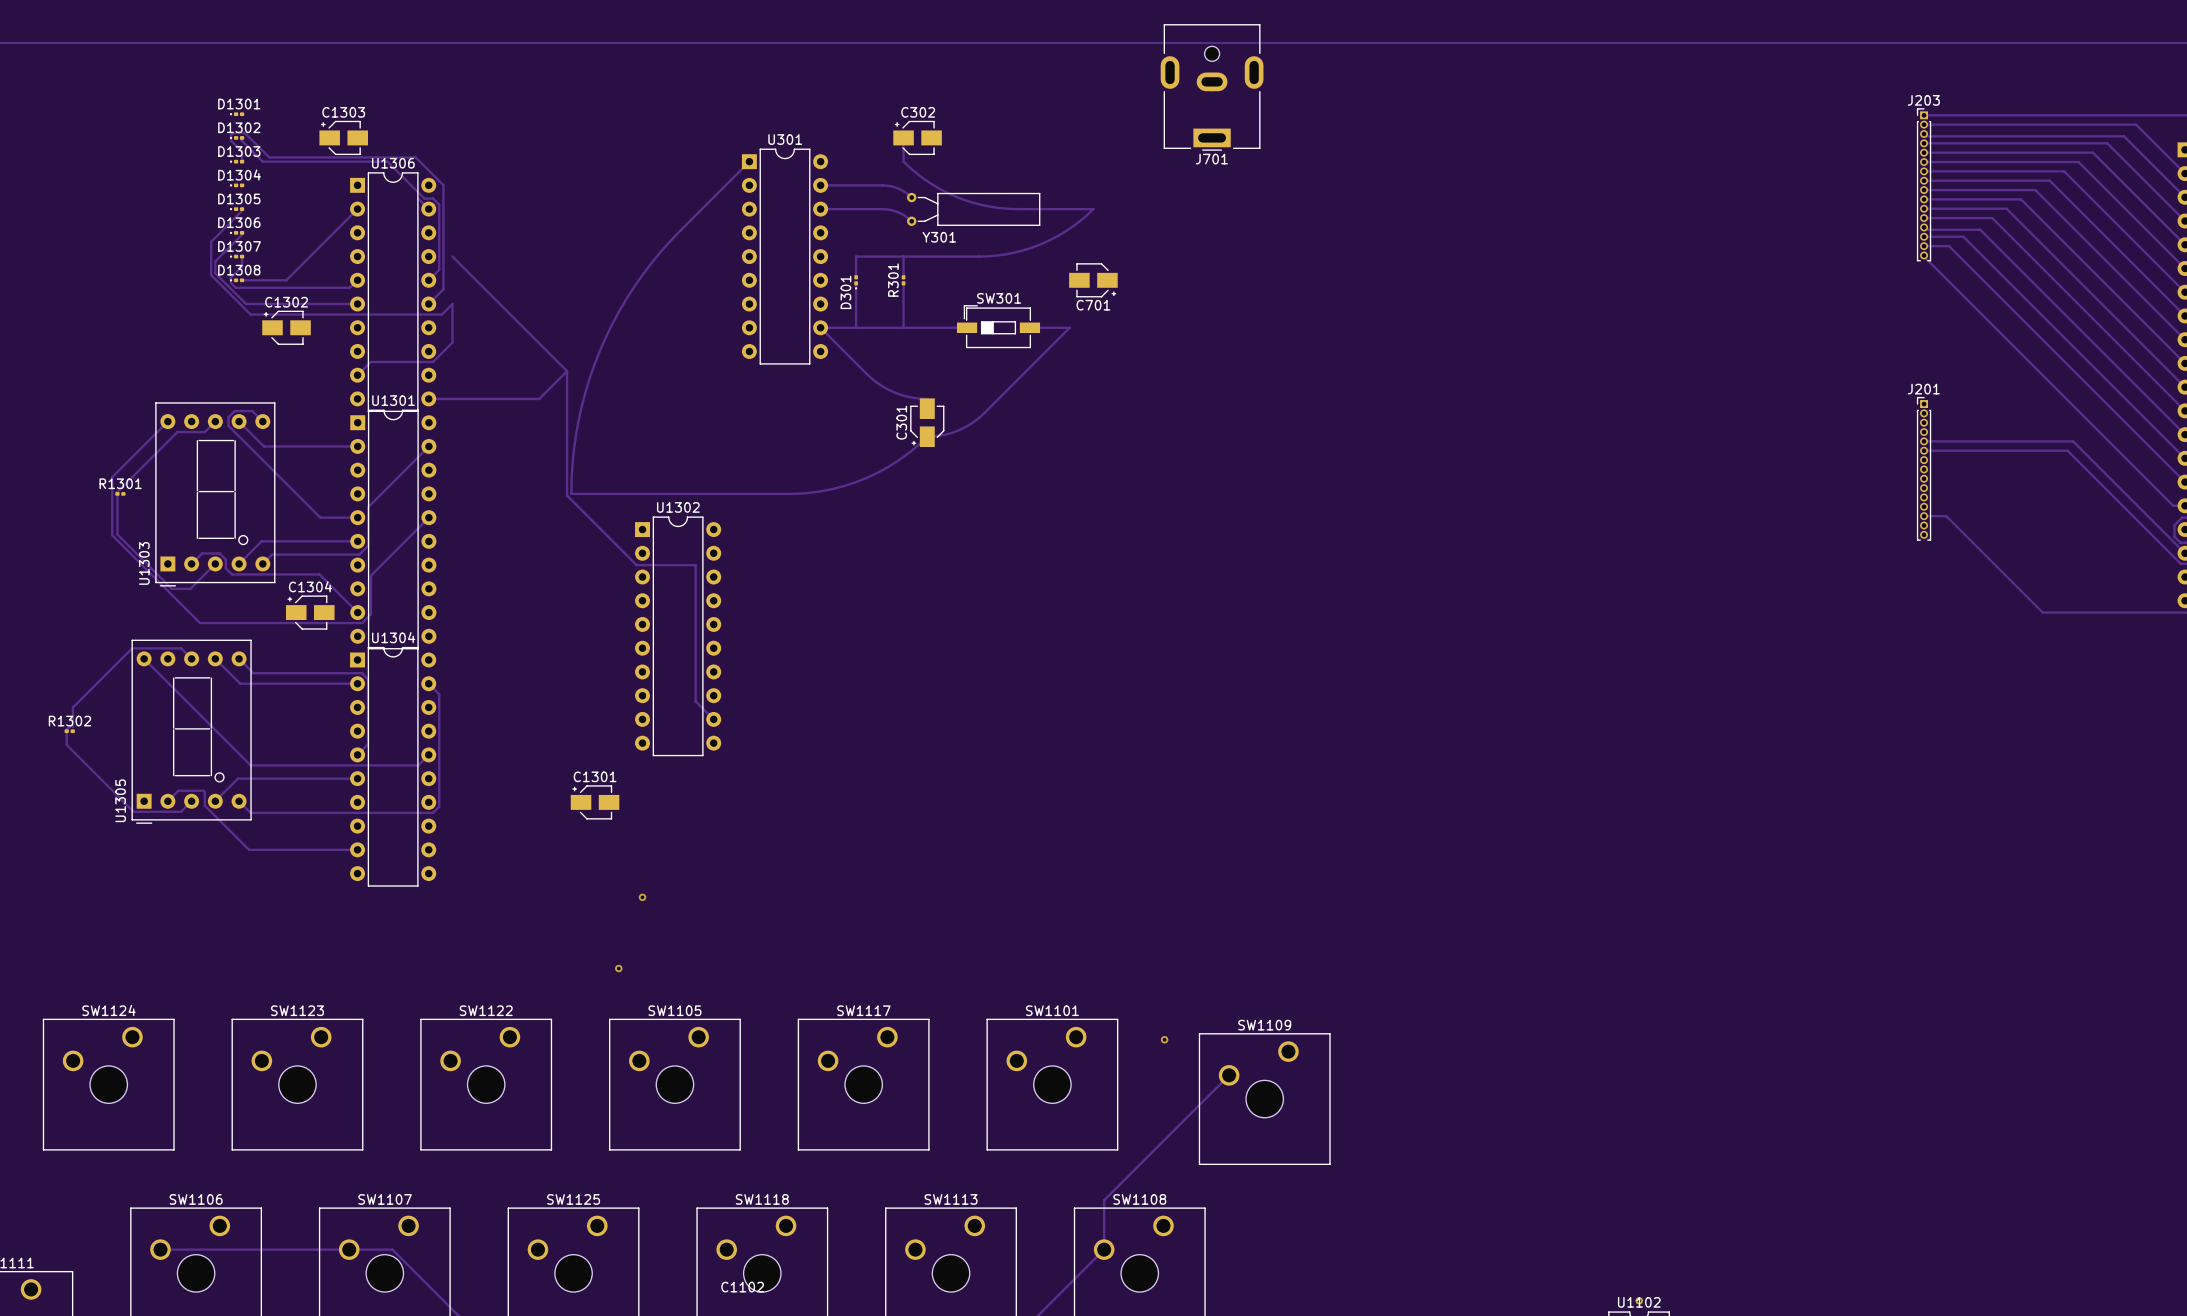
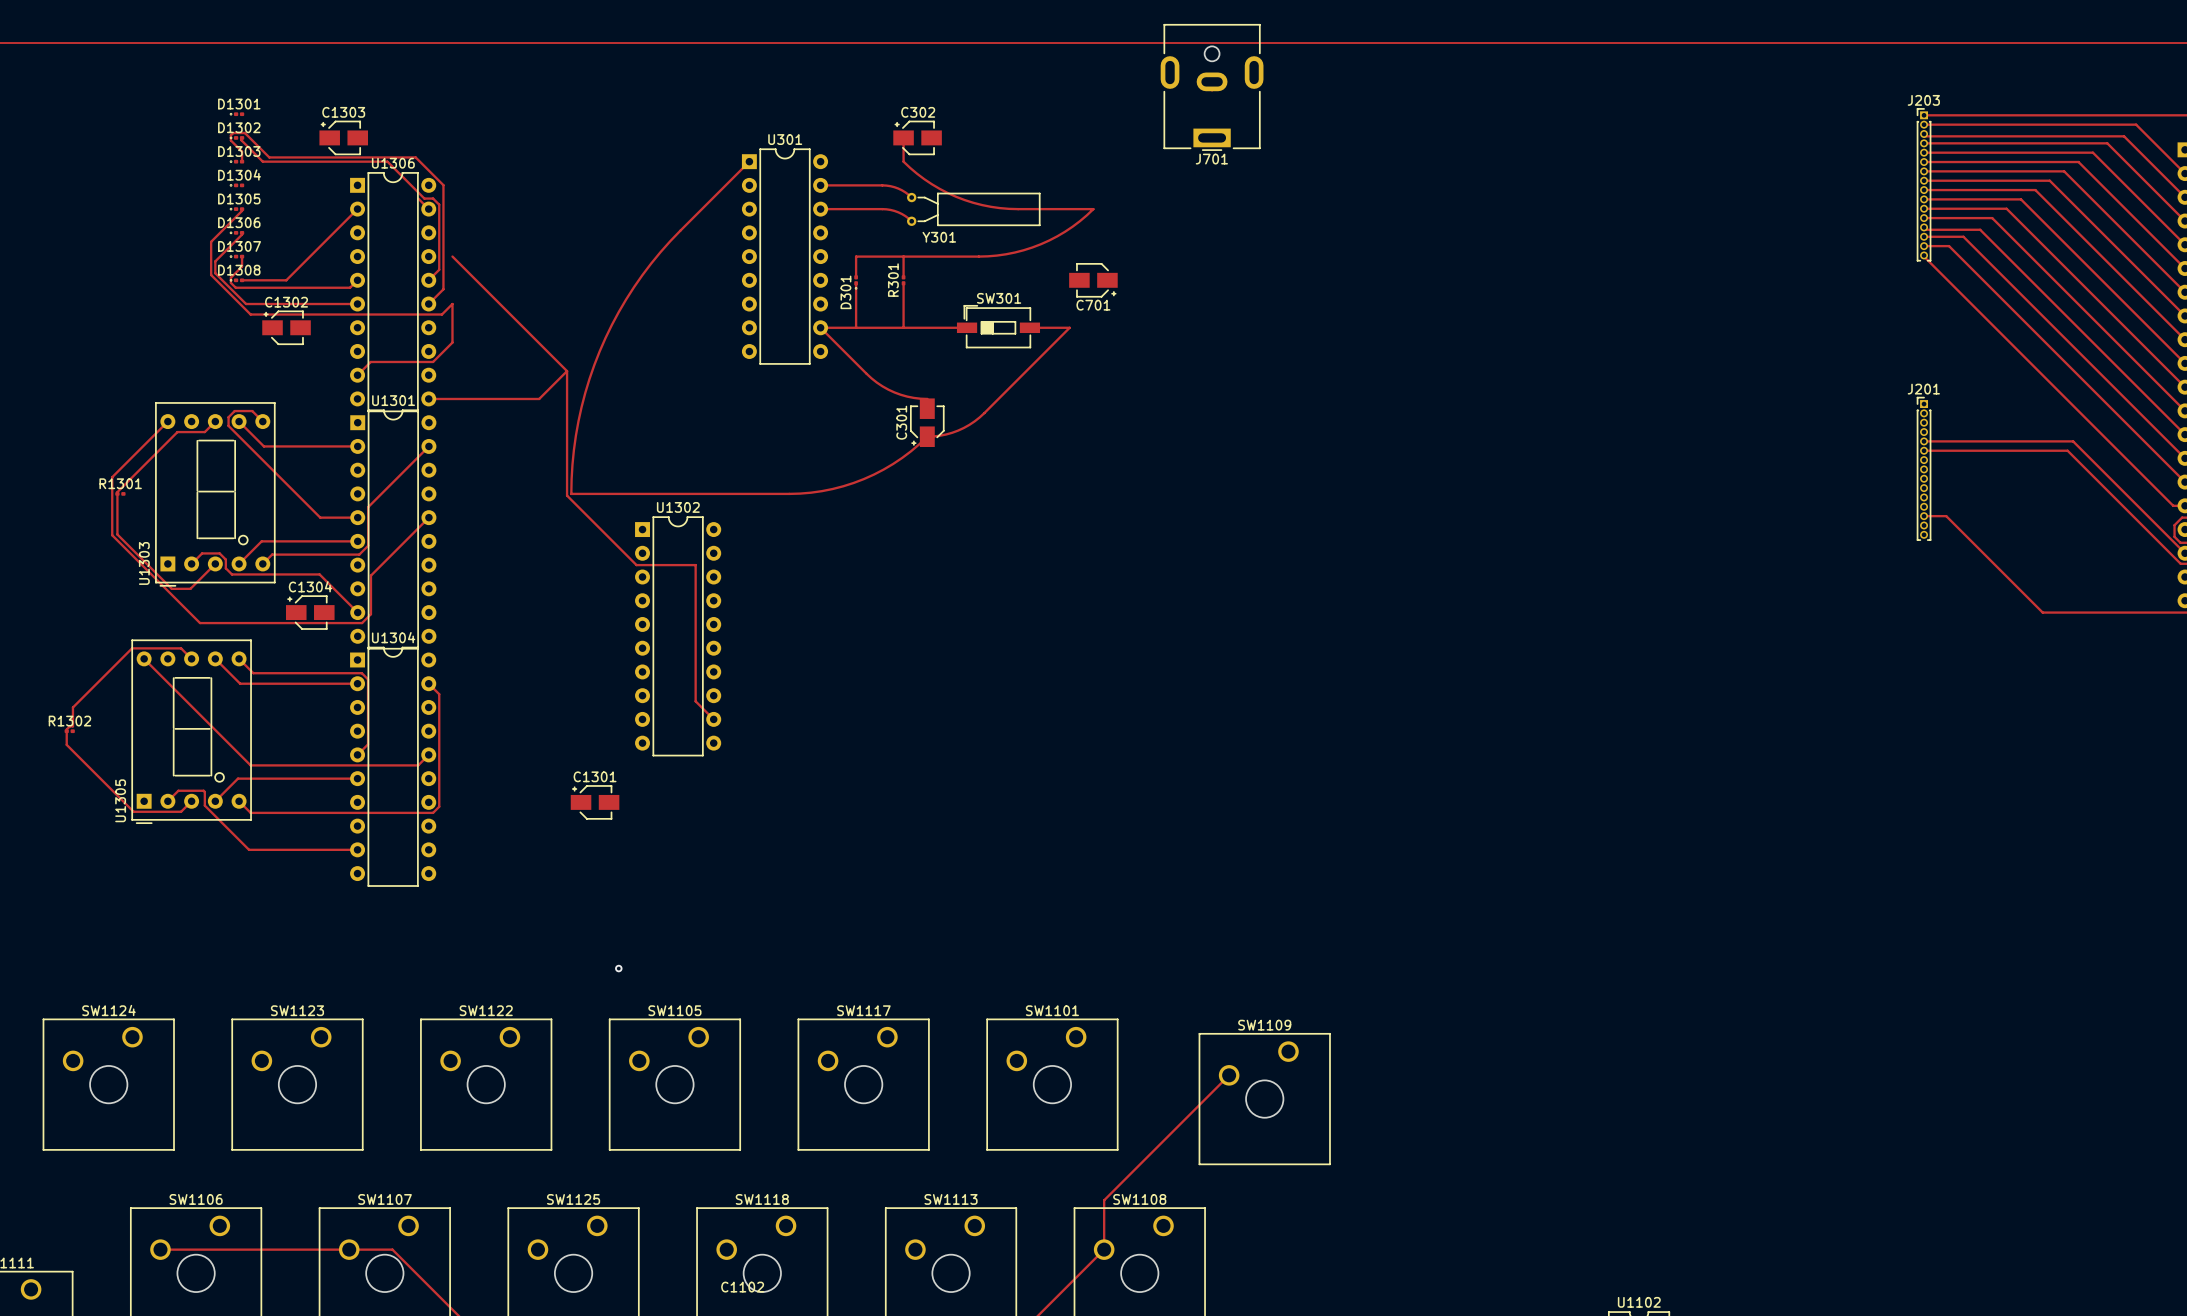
via: (642, 897) -> none
via: (1164, 1039) -> none
via: (1639, 1300) -> none

